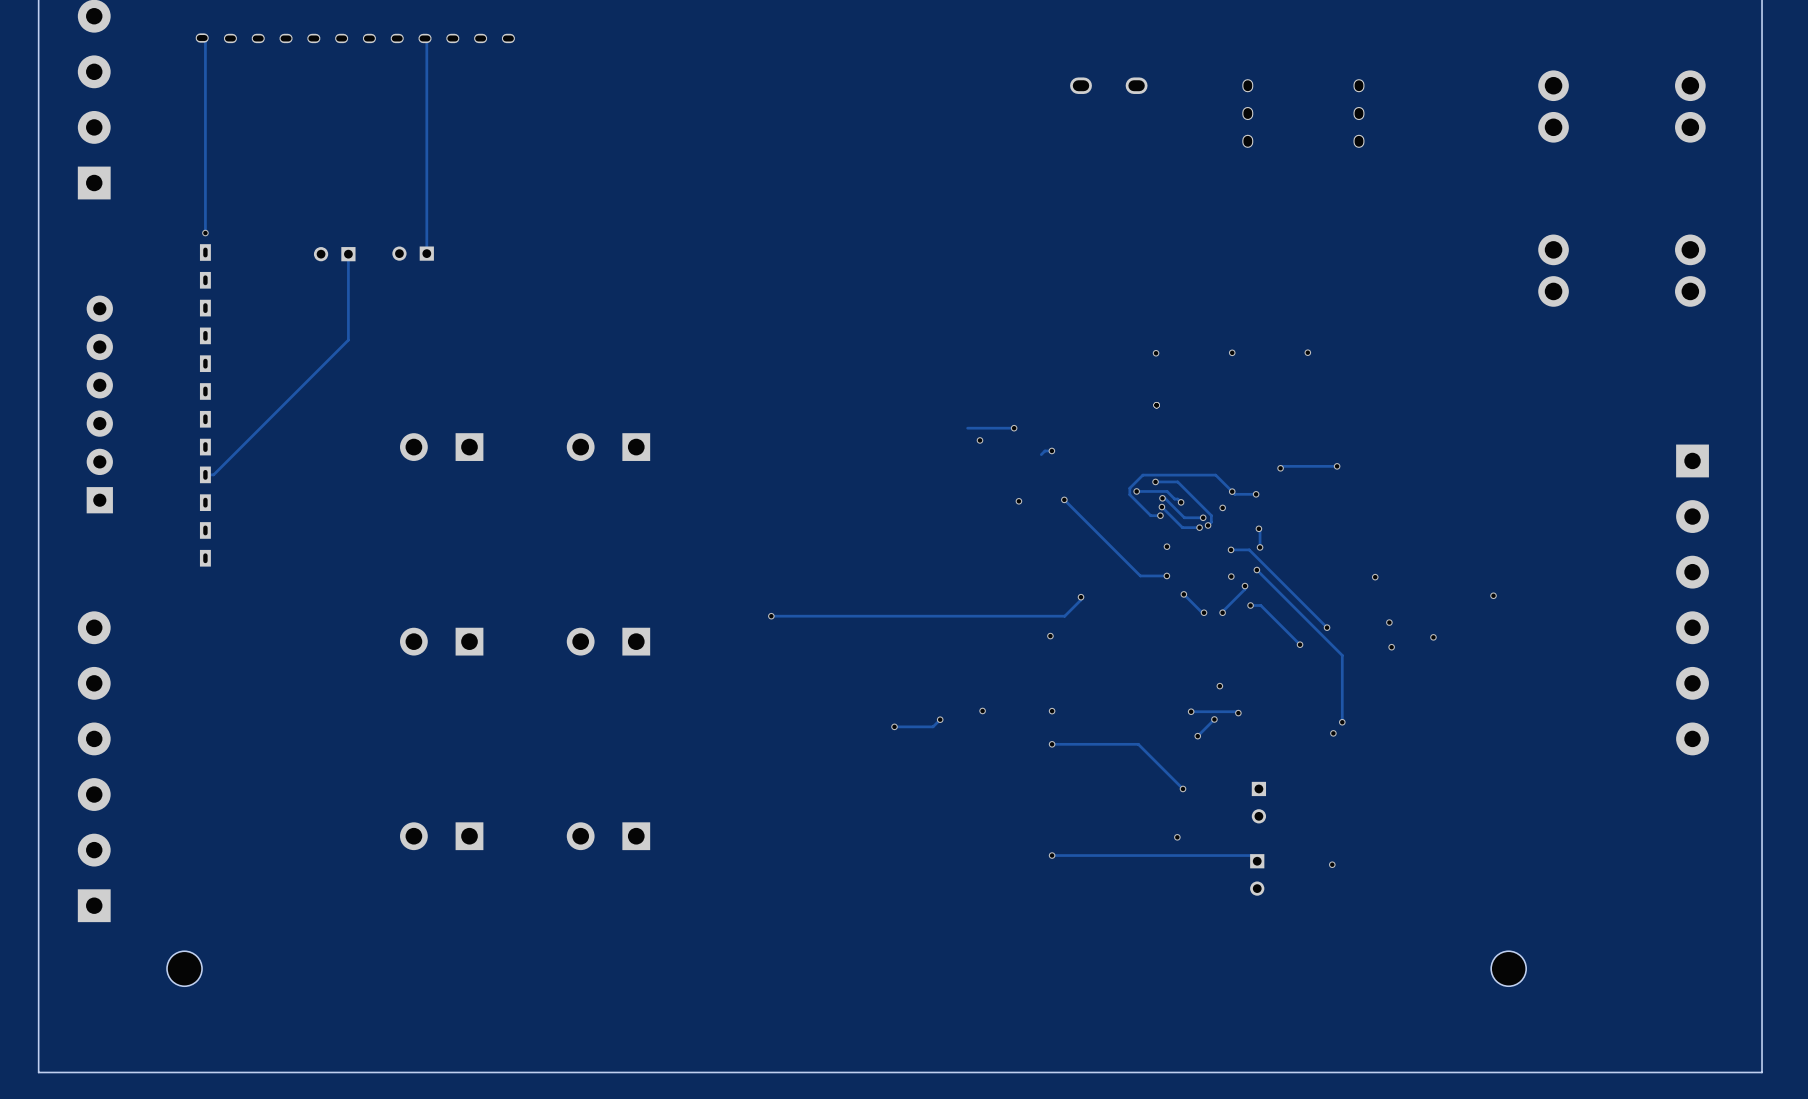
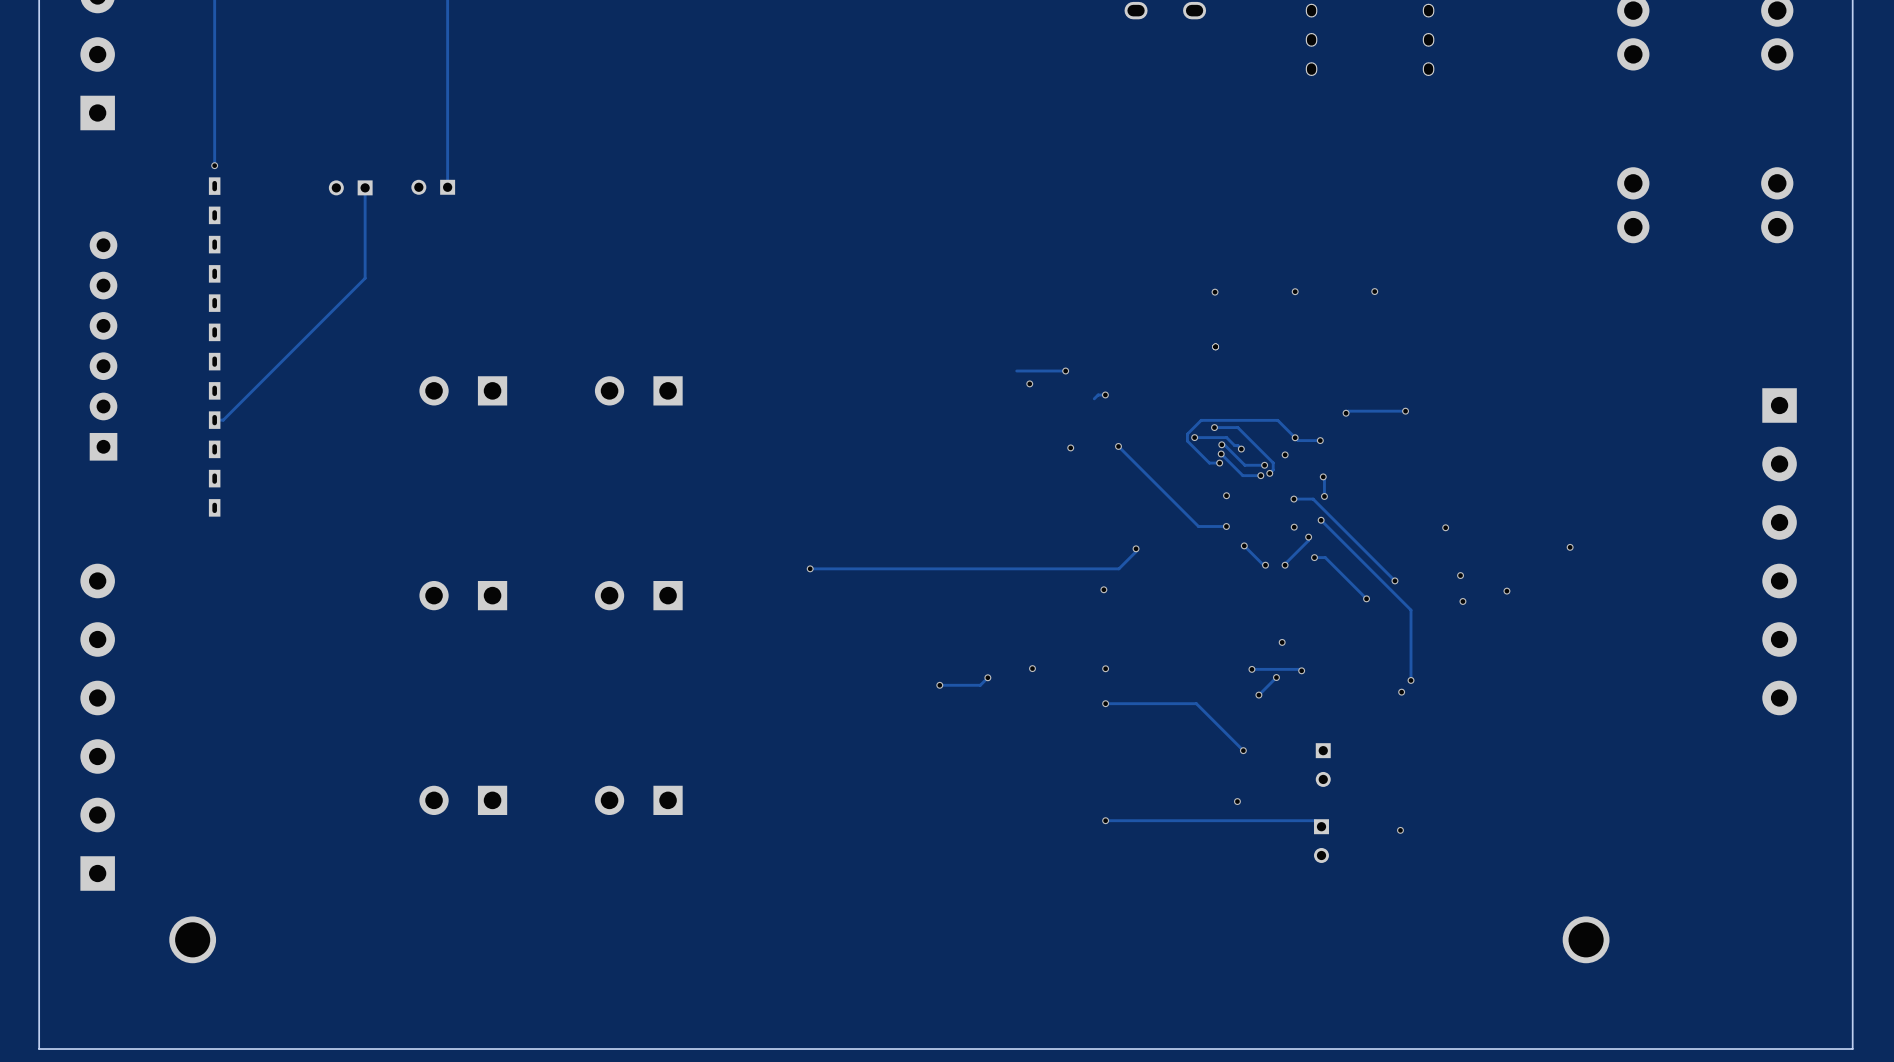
part footprint: [167, 951, 203, 987] -> [169, 916, 217, 964]
part footprint: [1491, 951, 1527, 987] -> [1562, 916, 1610, 964]

